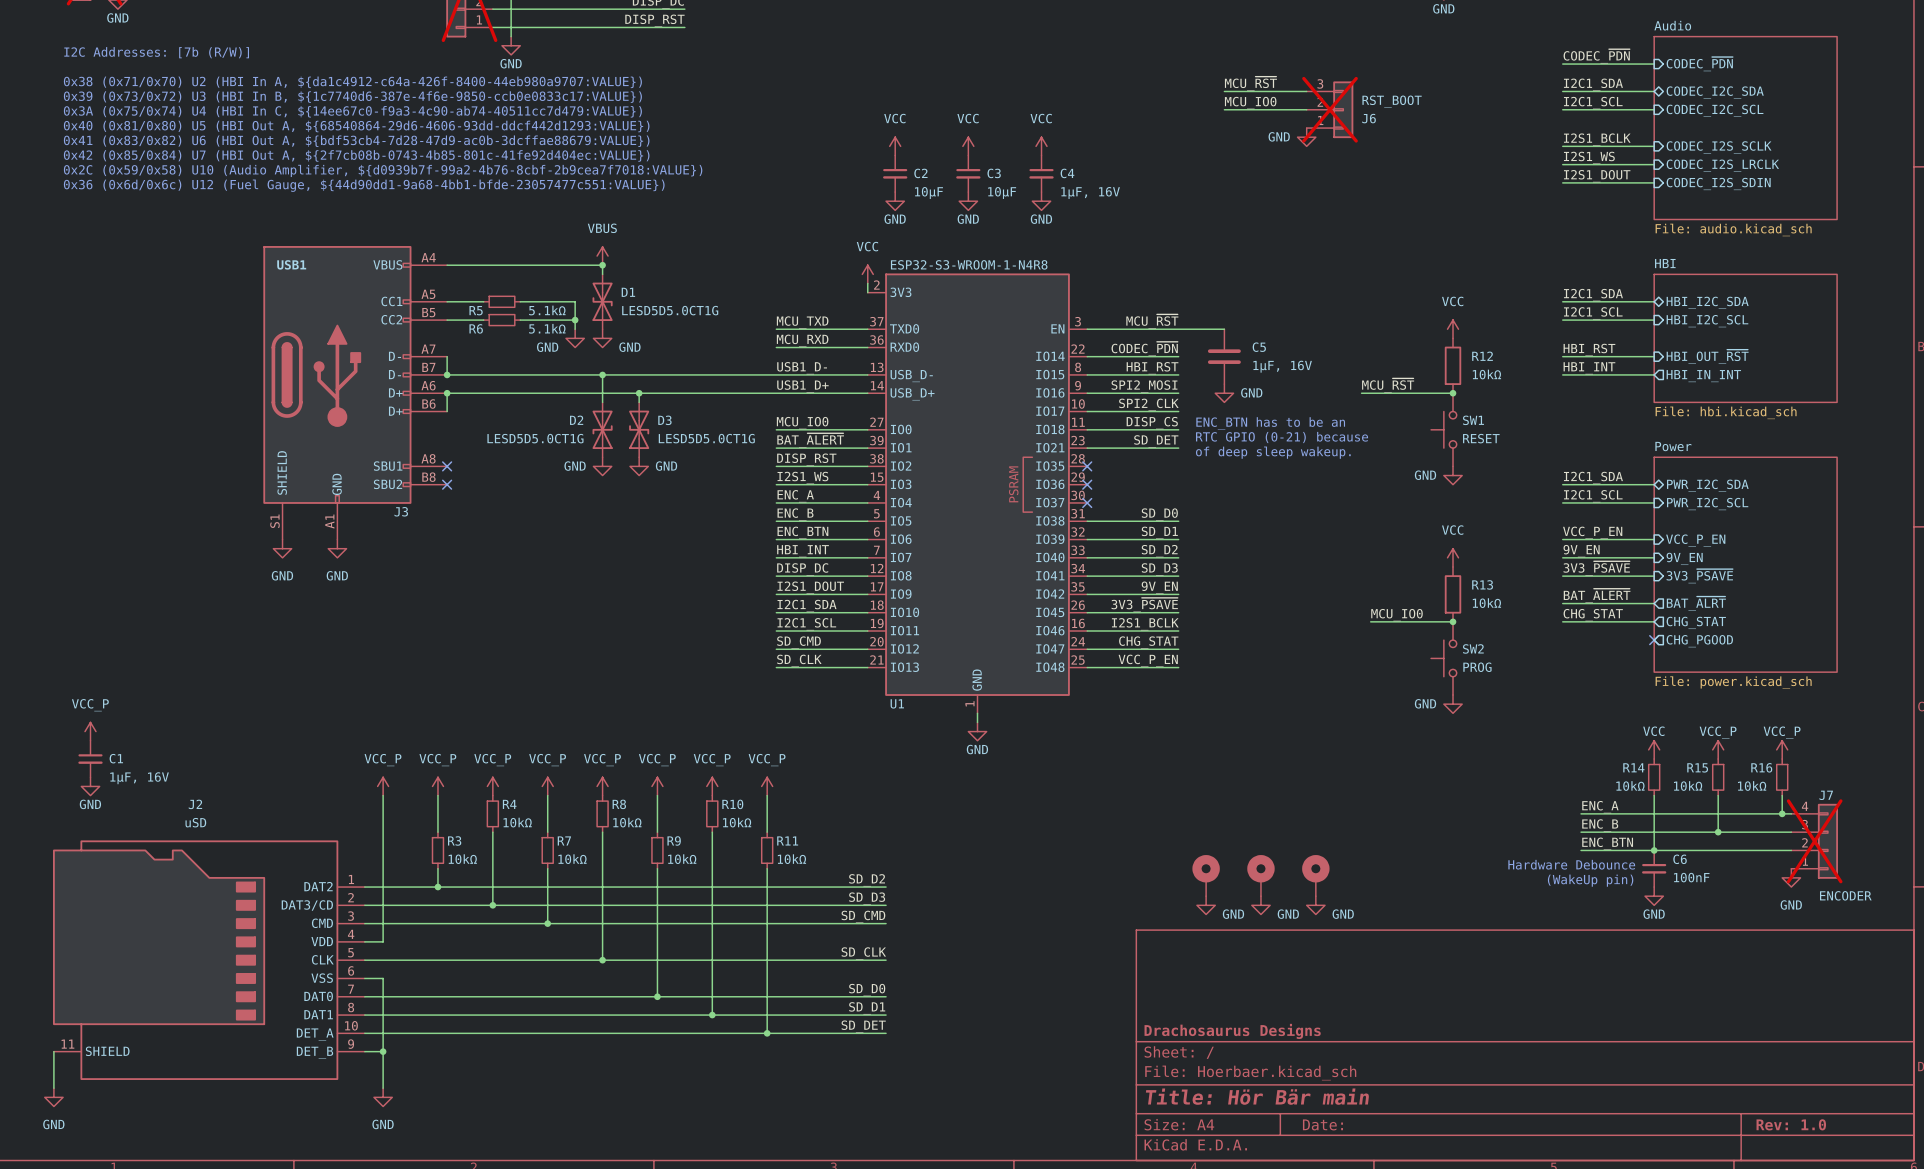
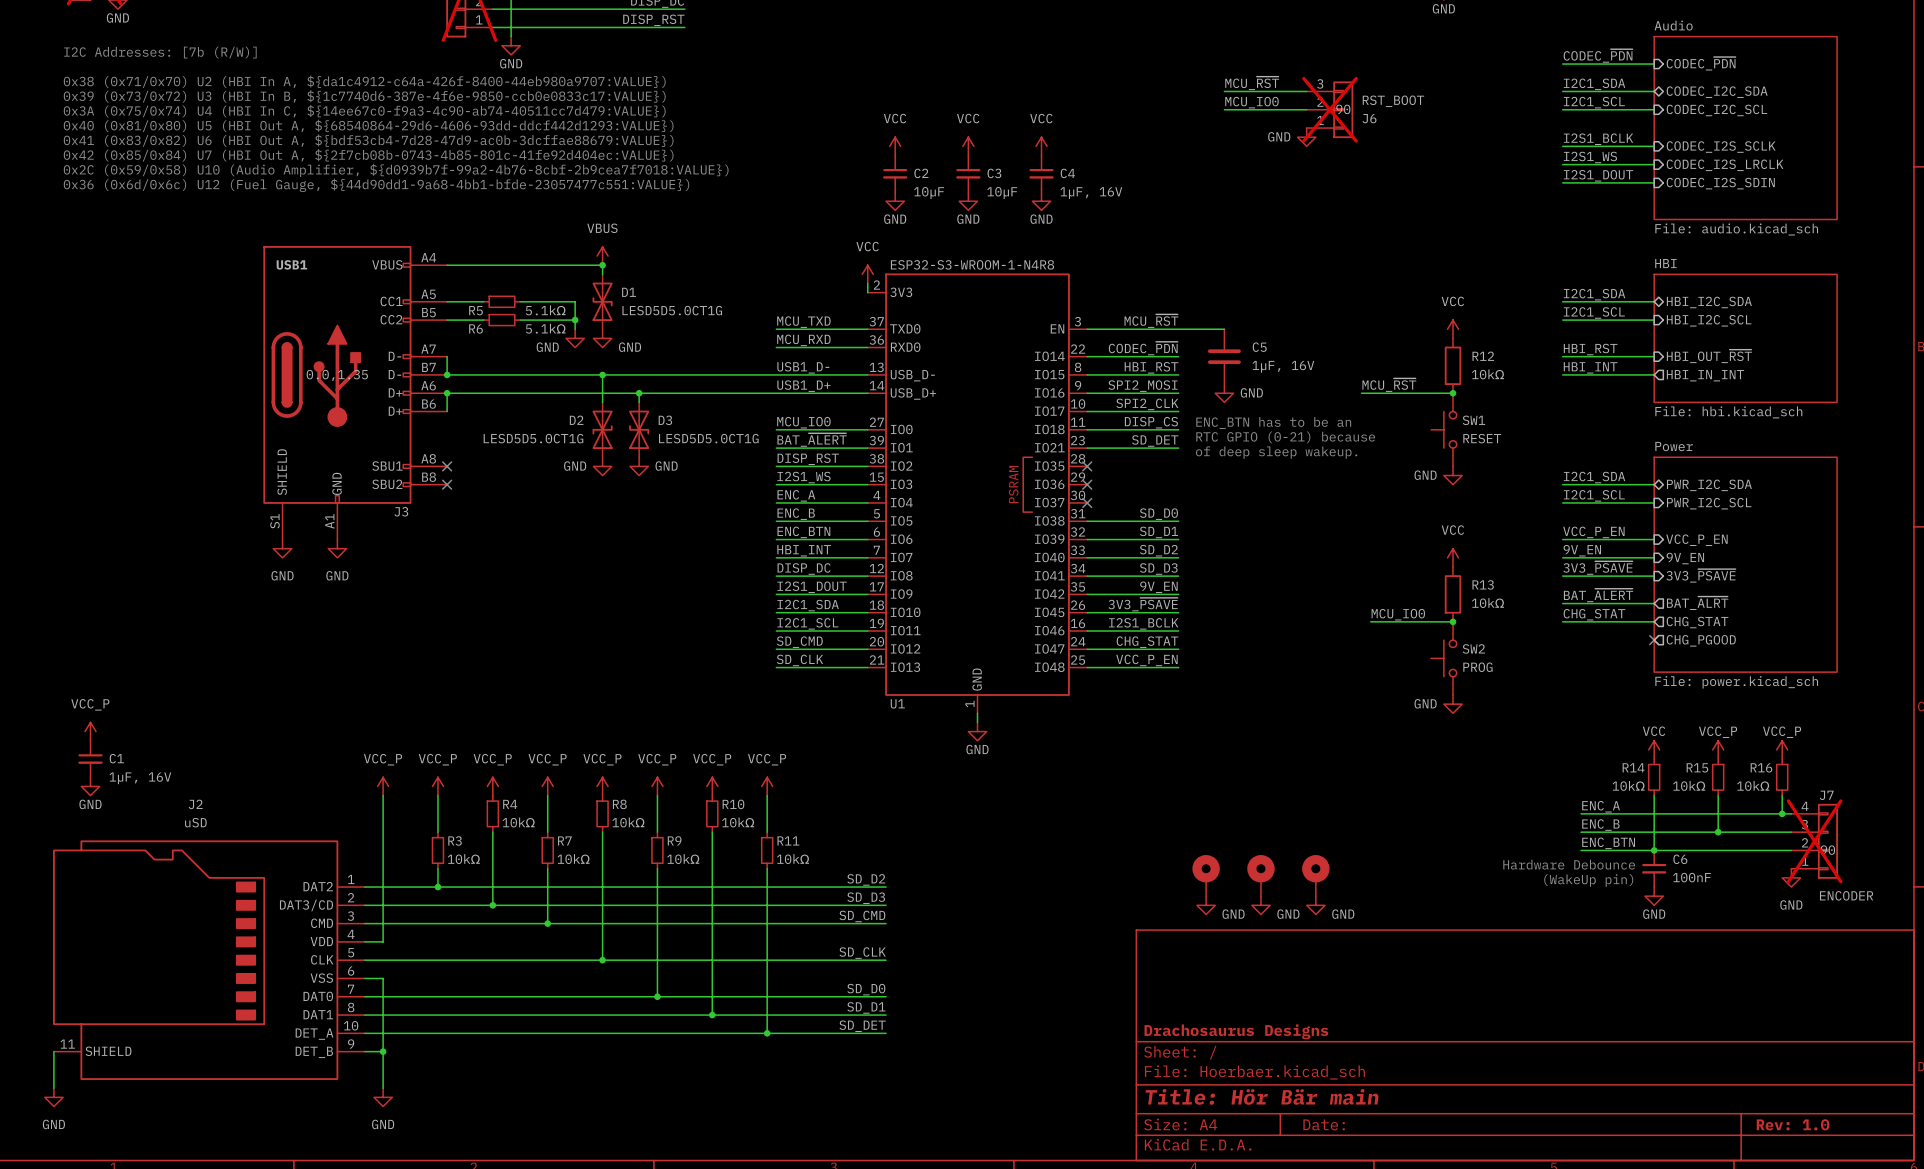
J6 text: none -> 90 (1343, 109)
J3 text: none -> 0.0,1.35 (337, 375)
J7 text: none -> 90 (1827, 850)

